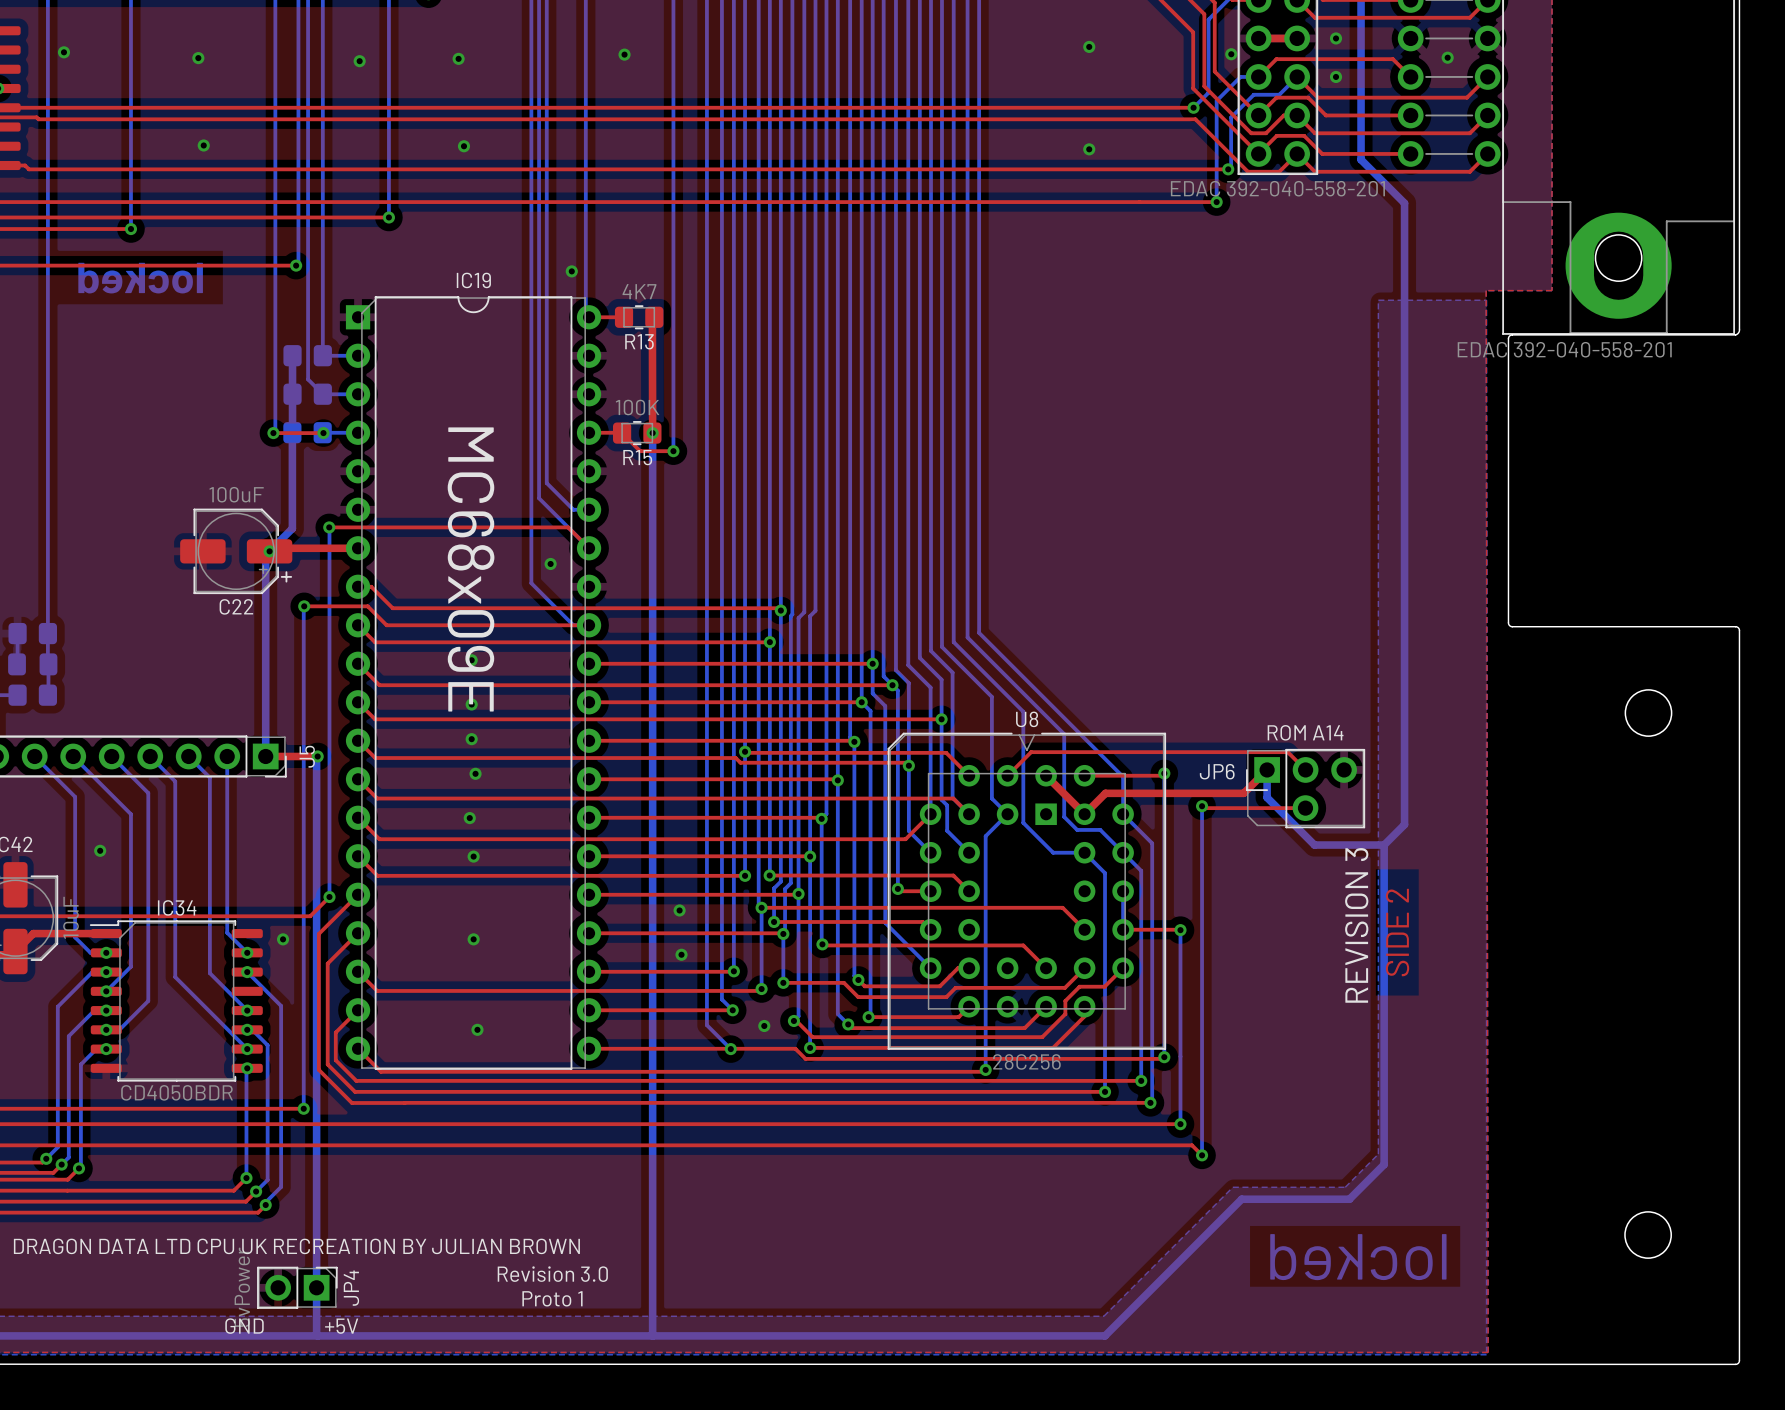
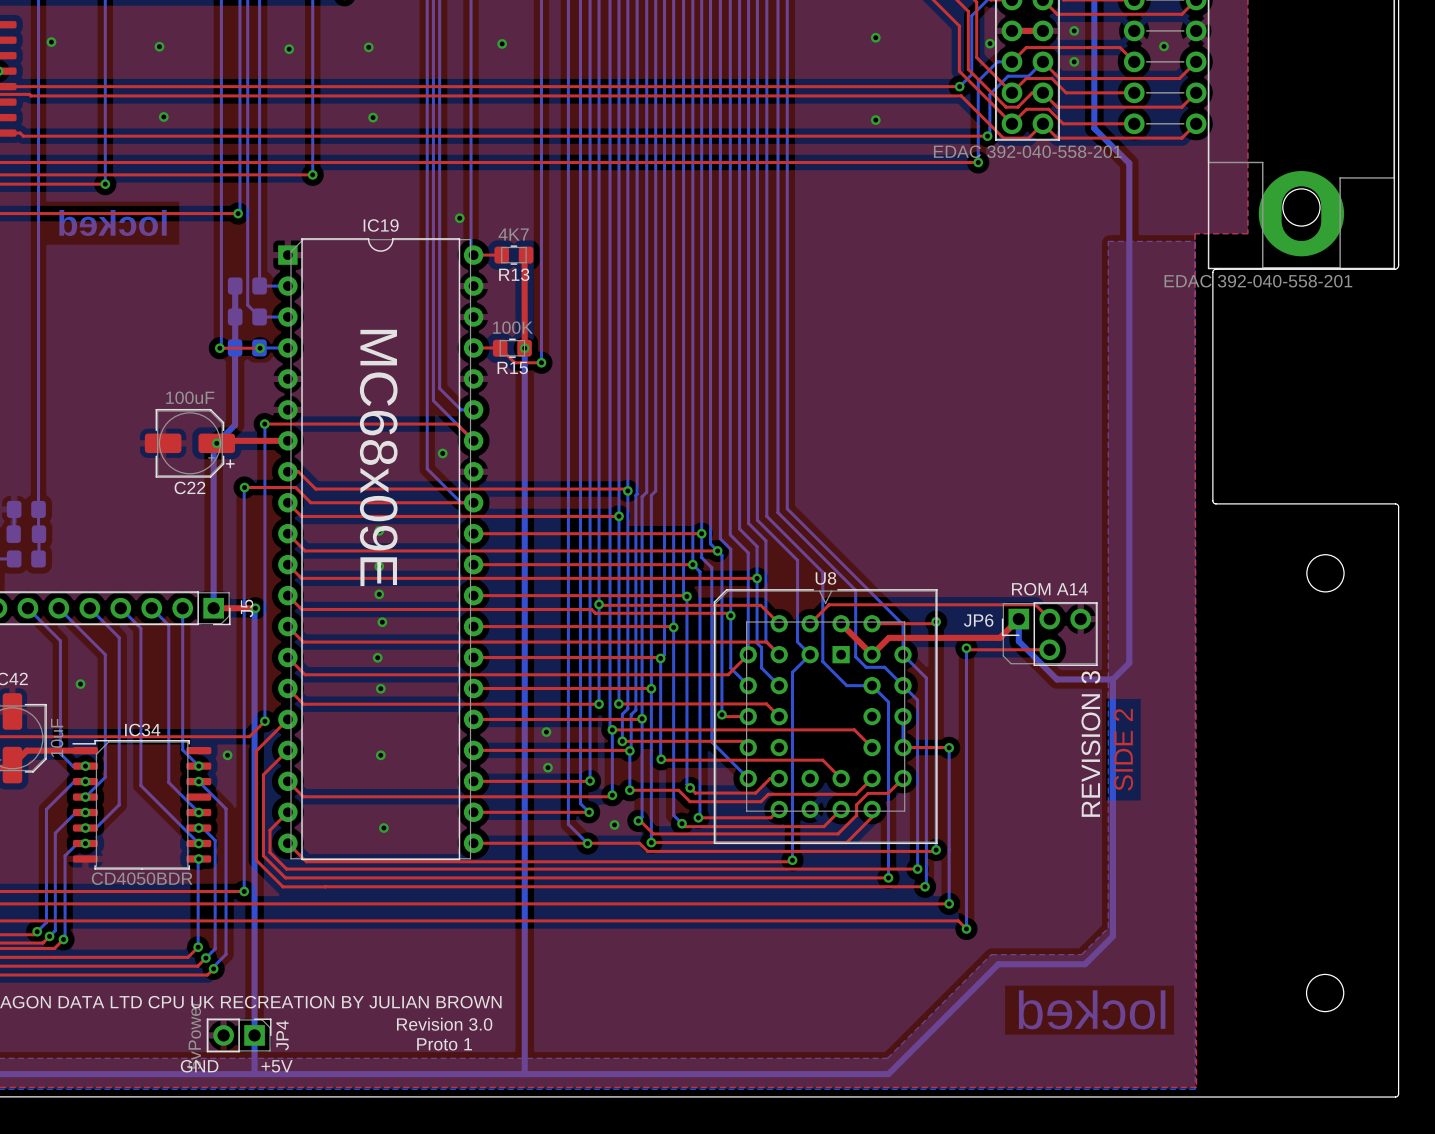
U8 value: 28C256 (1026, 1061) -> none

